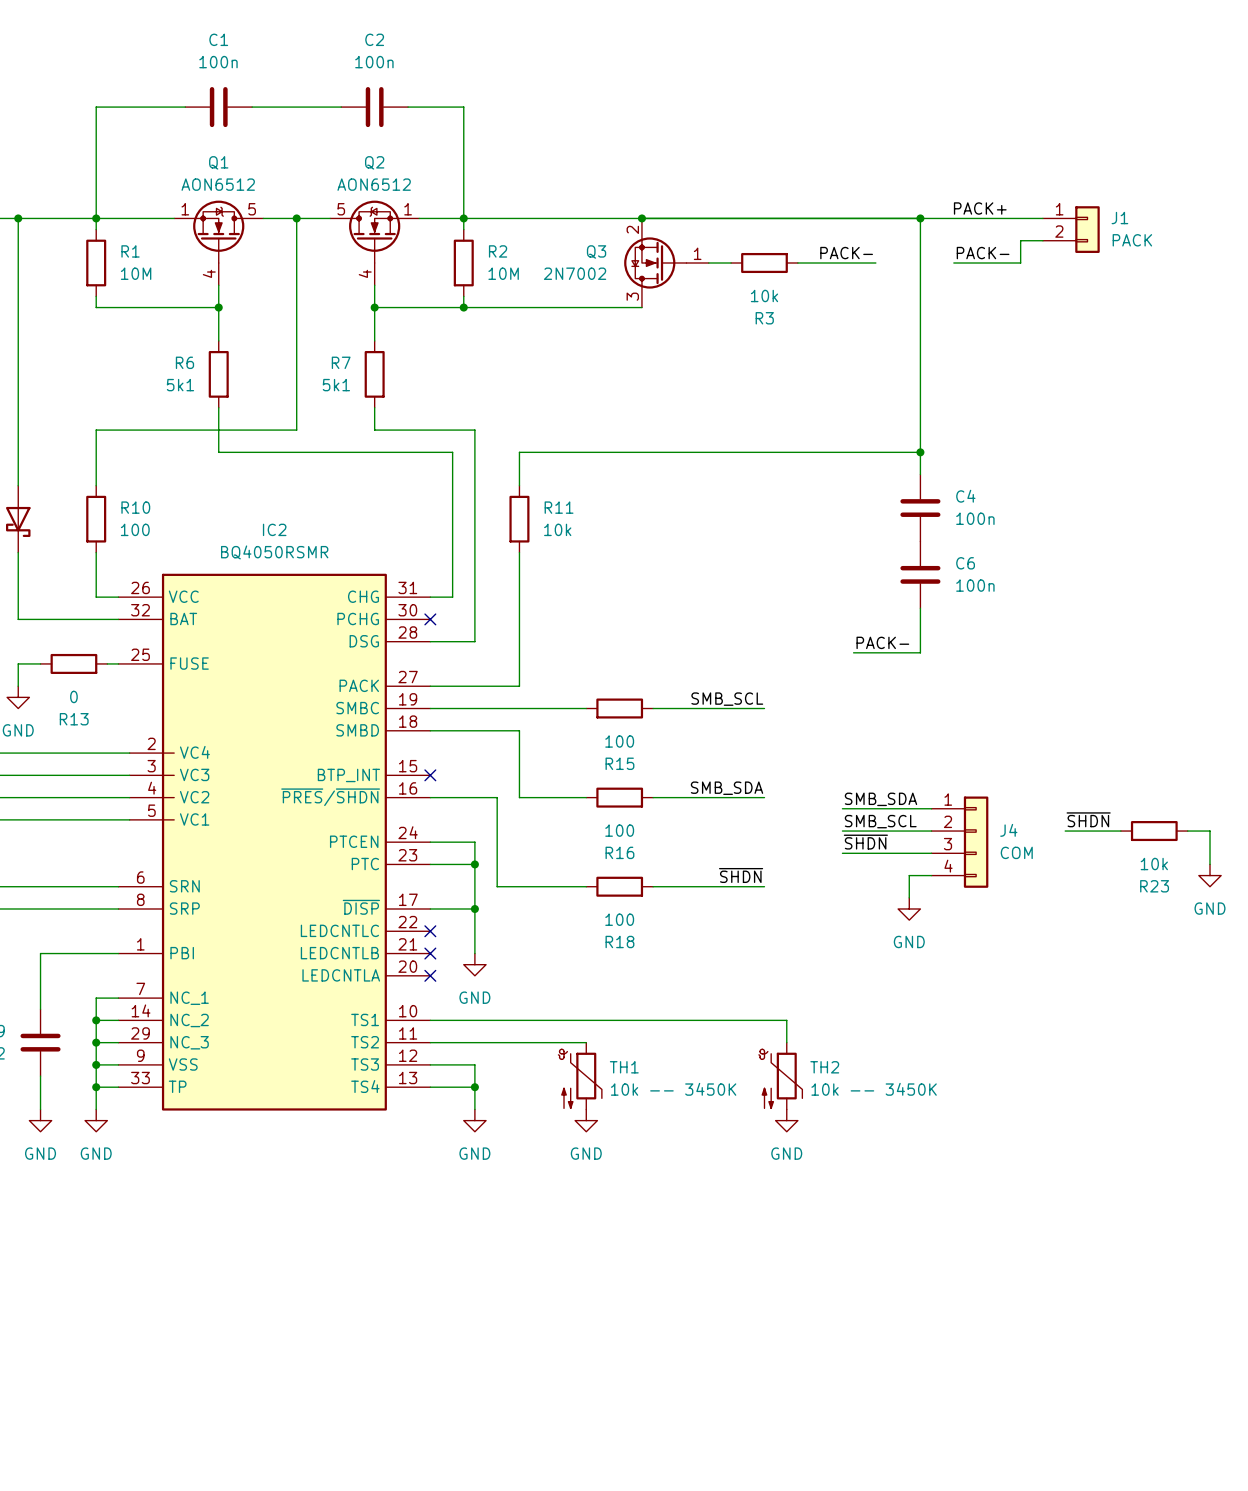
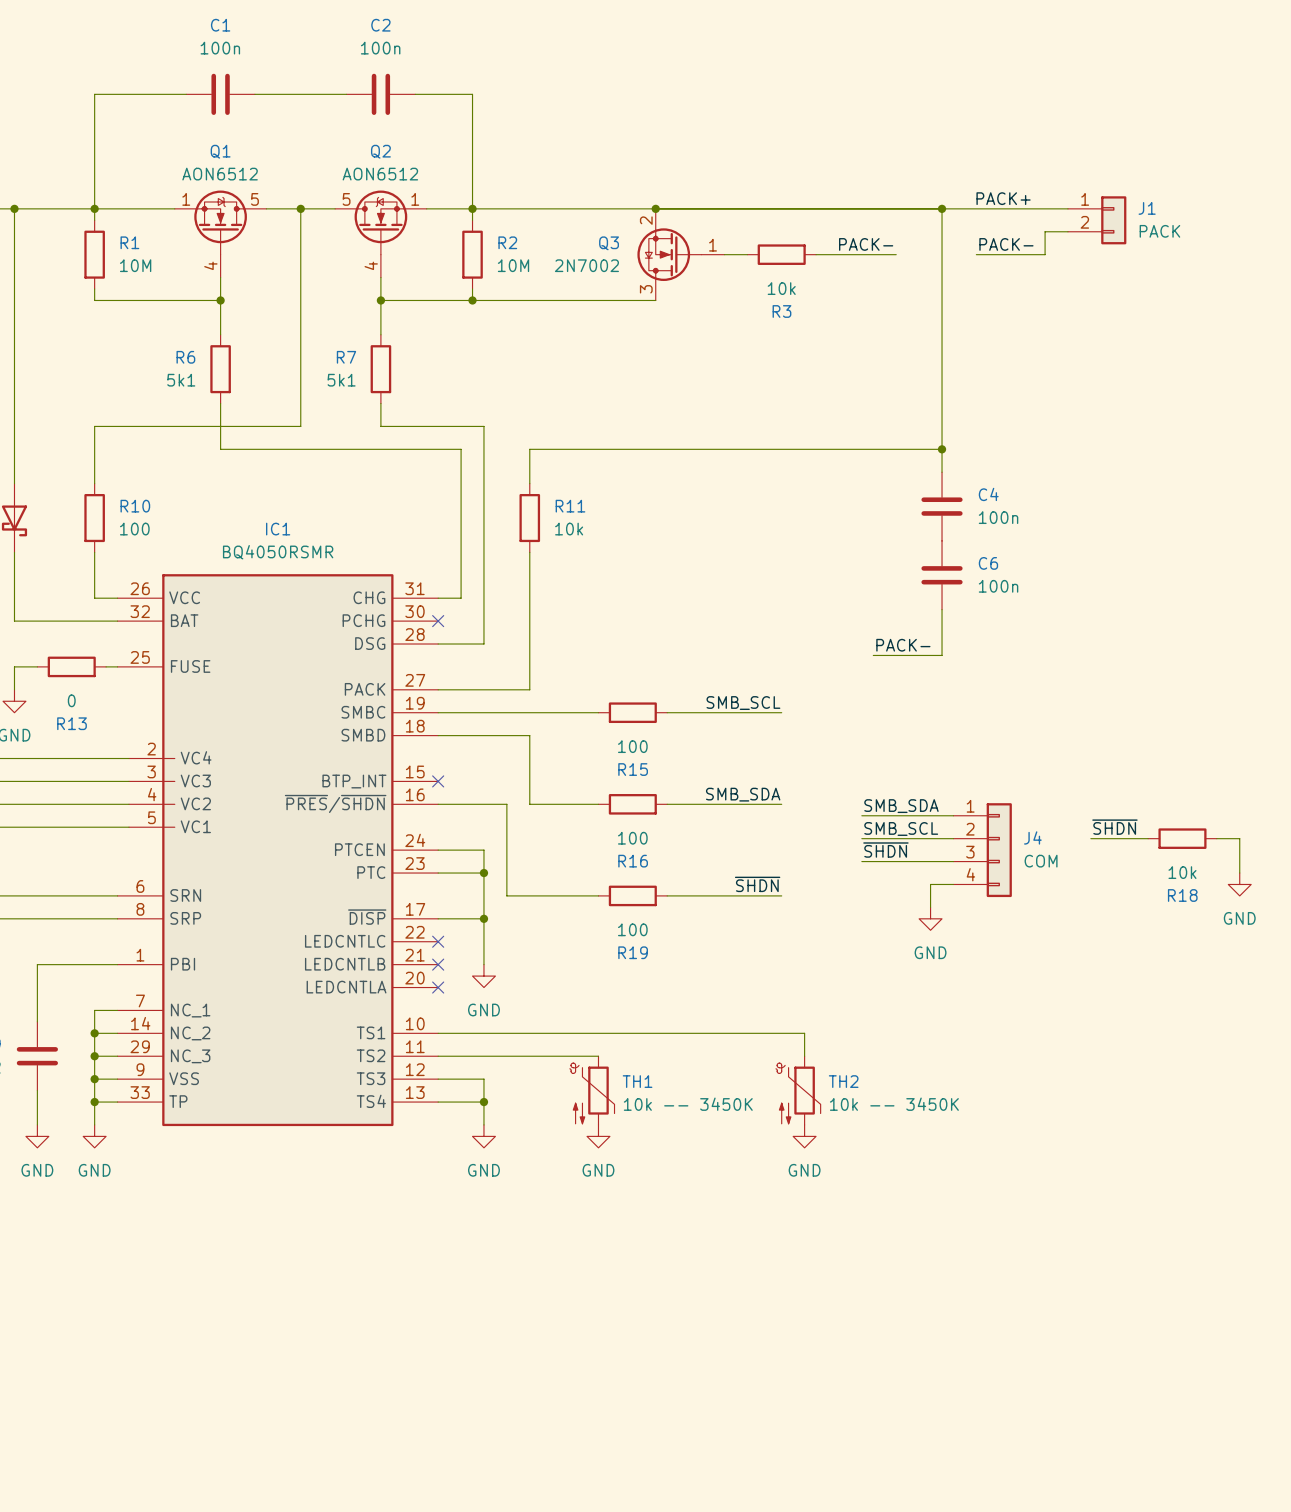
IC2 name: IC2 (274, 529) -> IC1 (278, 529)
R23 name: R23 (1154, 886) -> R18 (1182, 895)
R18 name: R18 (619, 941) -> R19 (633, 952)

